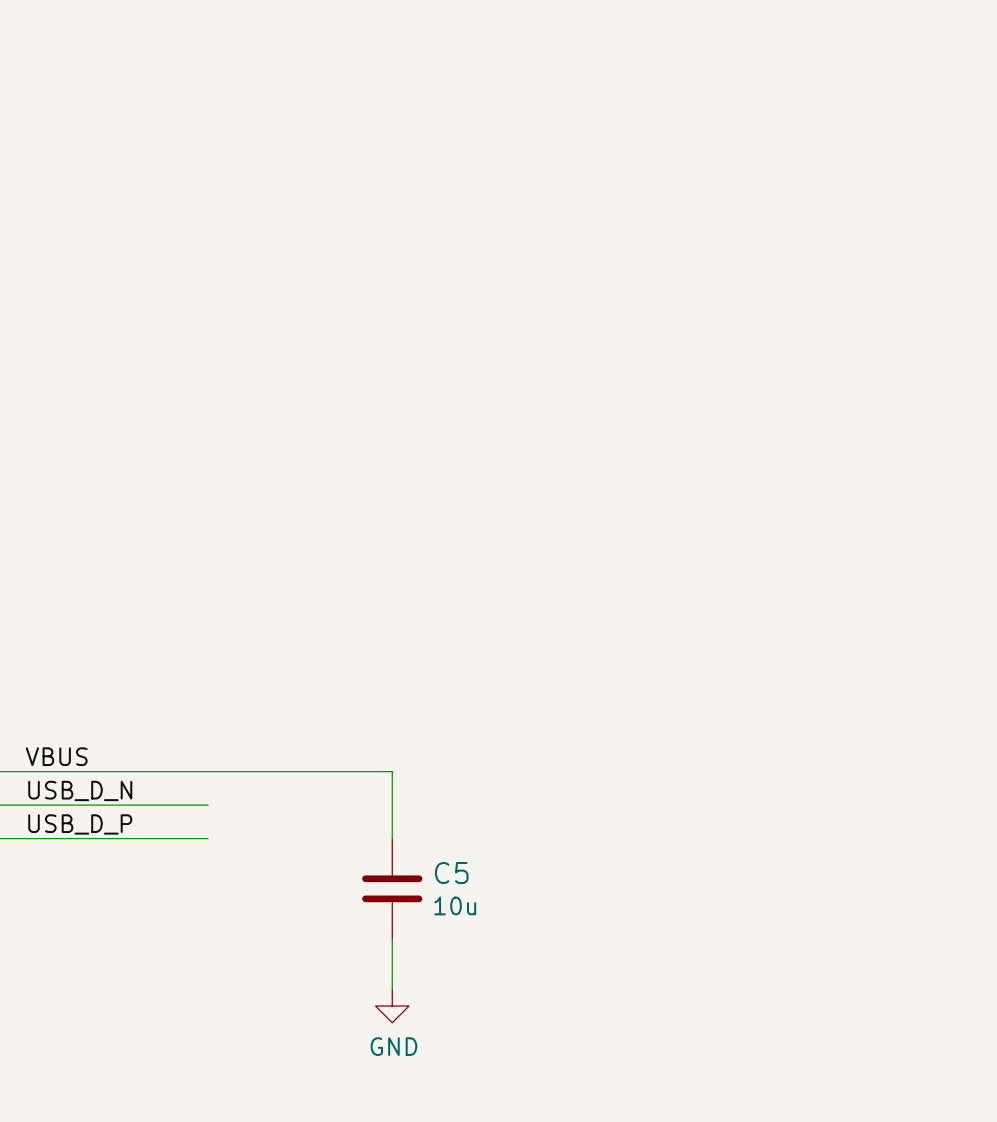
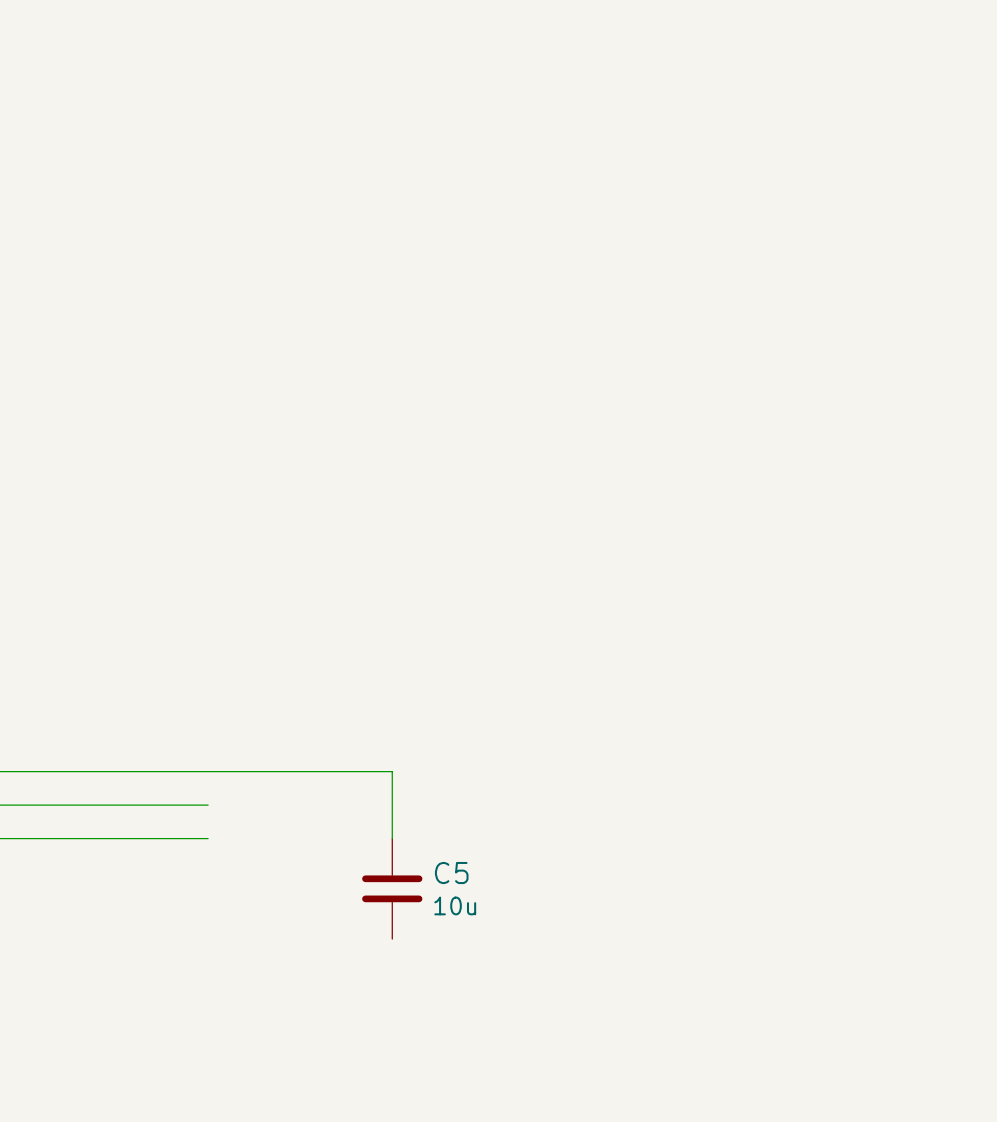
label: VBUS (56, 756) -> none
label: USB_D_N (80, 790) -> none
label: USB_D_P (80, 824) -> none
wire: (392, 939) (392, 989) -> none
power symbol: GND (392, 1006) -> none

